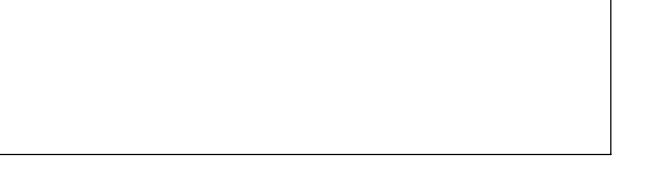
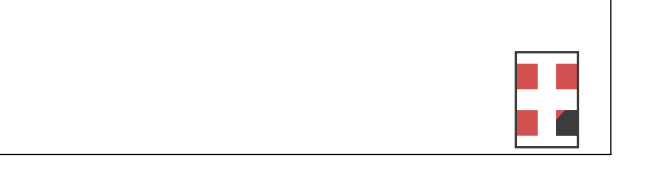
part: none -> (546, 99)

